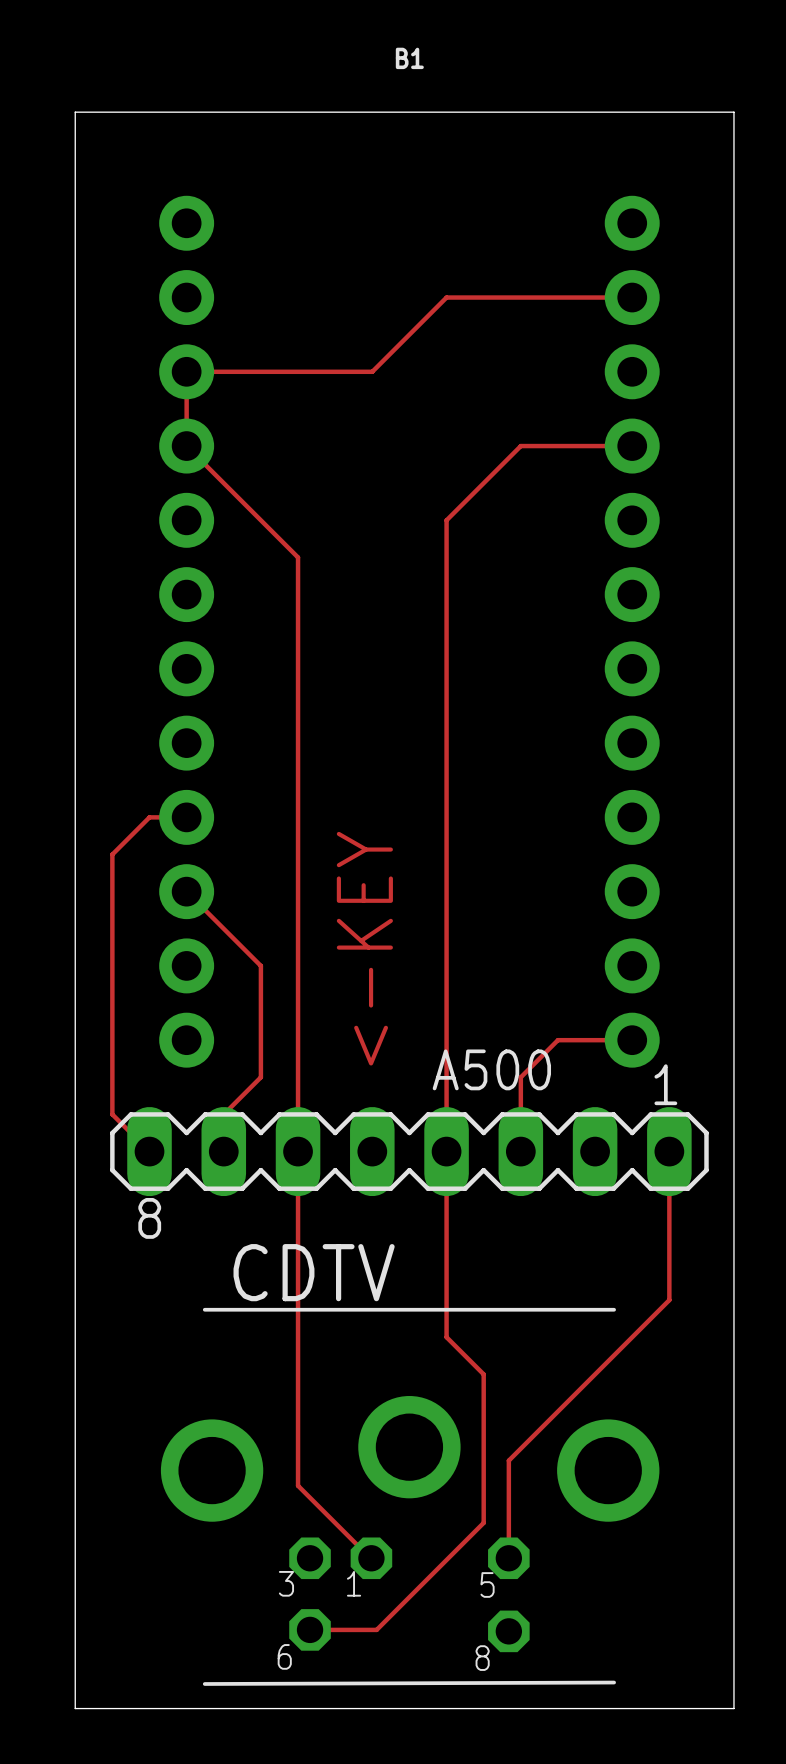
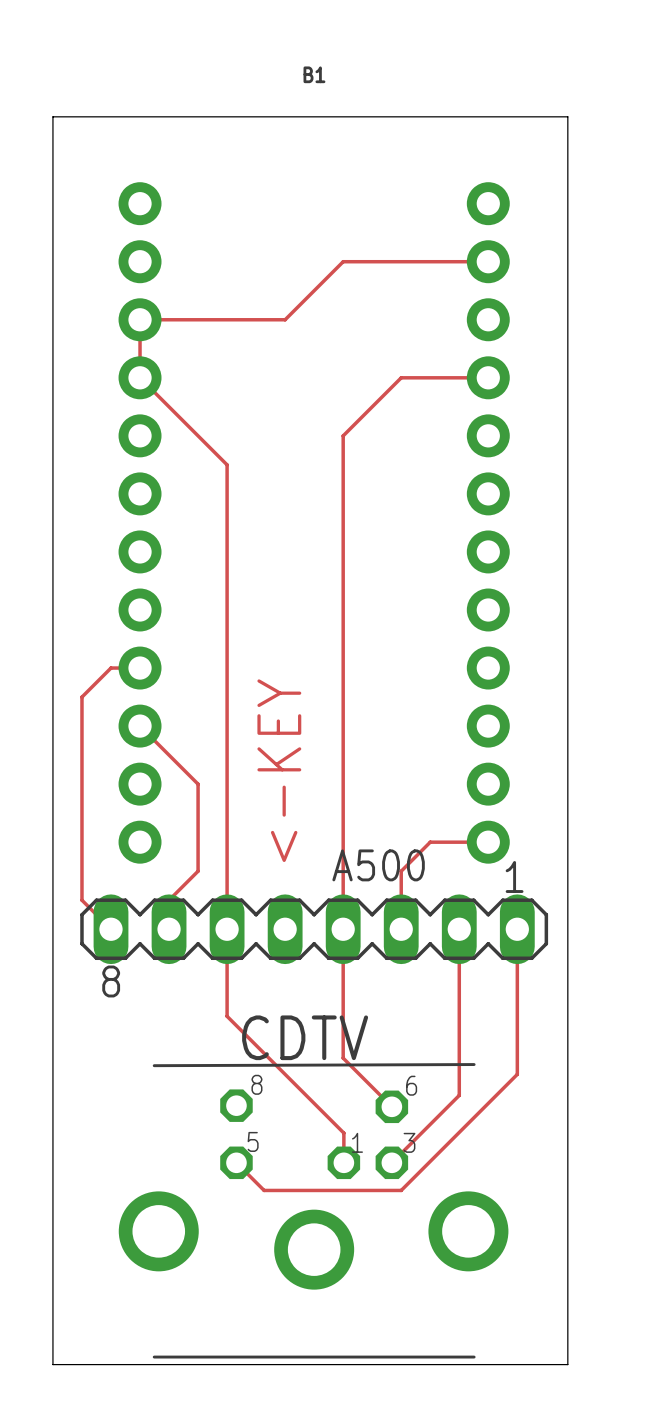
track: none -> (459, 929) (459, 1095) (391, 1162)
track: (298, 1262) (298, 1485) (371, 1558) -> (227, 1016) (343, 1133) (343, 1162)
track: (669, 1300) (508, 1460) (508, 1558) -> (517, 1045) (517, 1074) (401, 1190) (264, 1190) (236, 1162)
CDTV footprint: [160, 1307, 660, 1686] -> [118, 1063, 509, 1359]
track: (446, 1316) (446, 1337) (483, 1374) (483, 1522) (376, 1629) (310, 1629) -> (343, 1058) (391, 1106)

